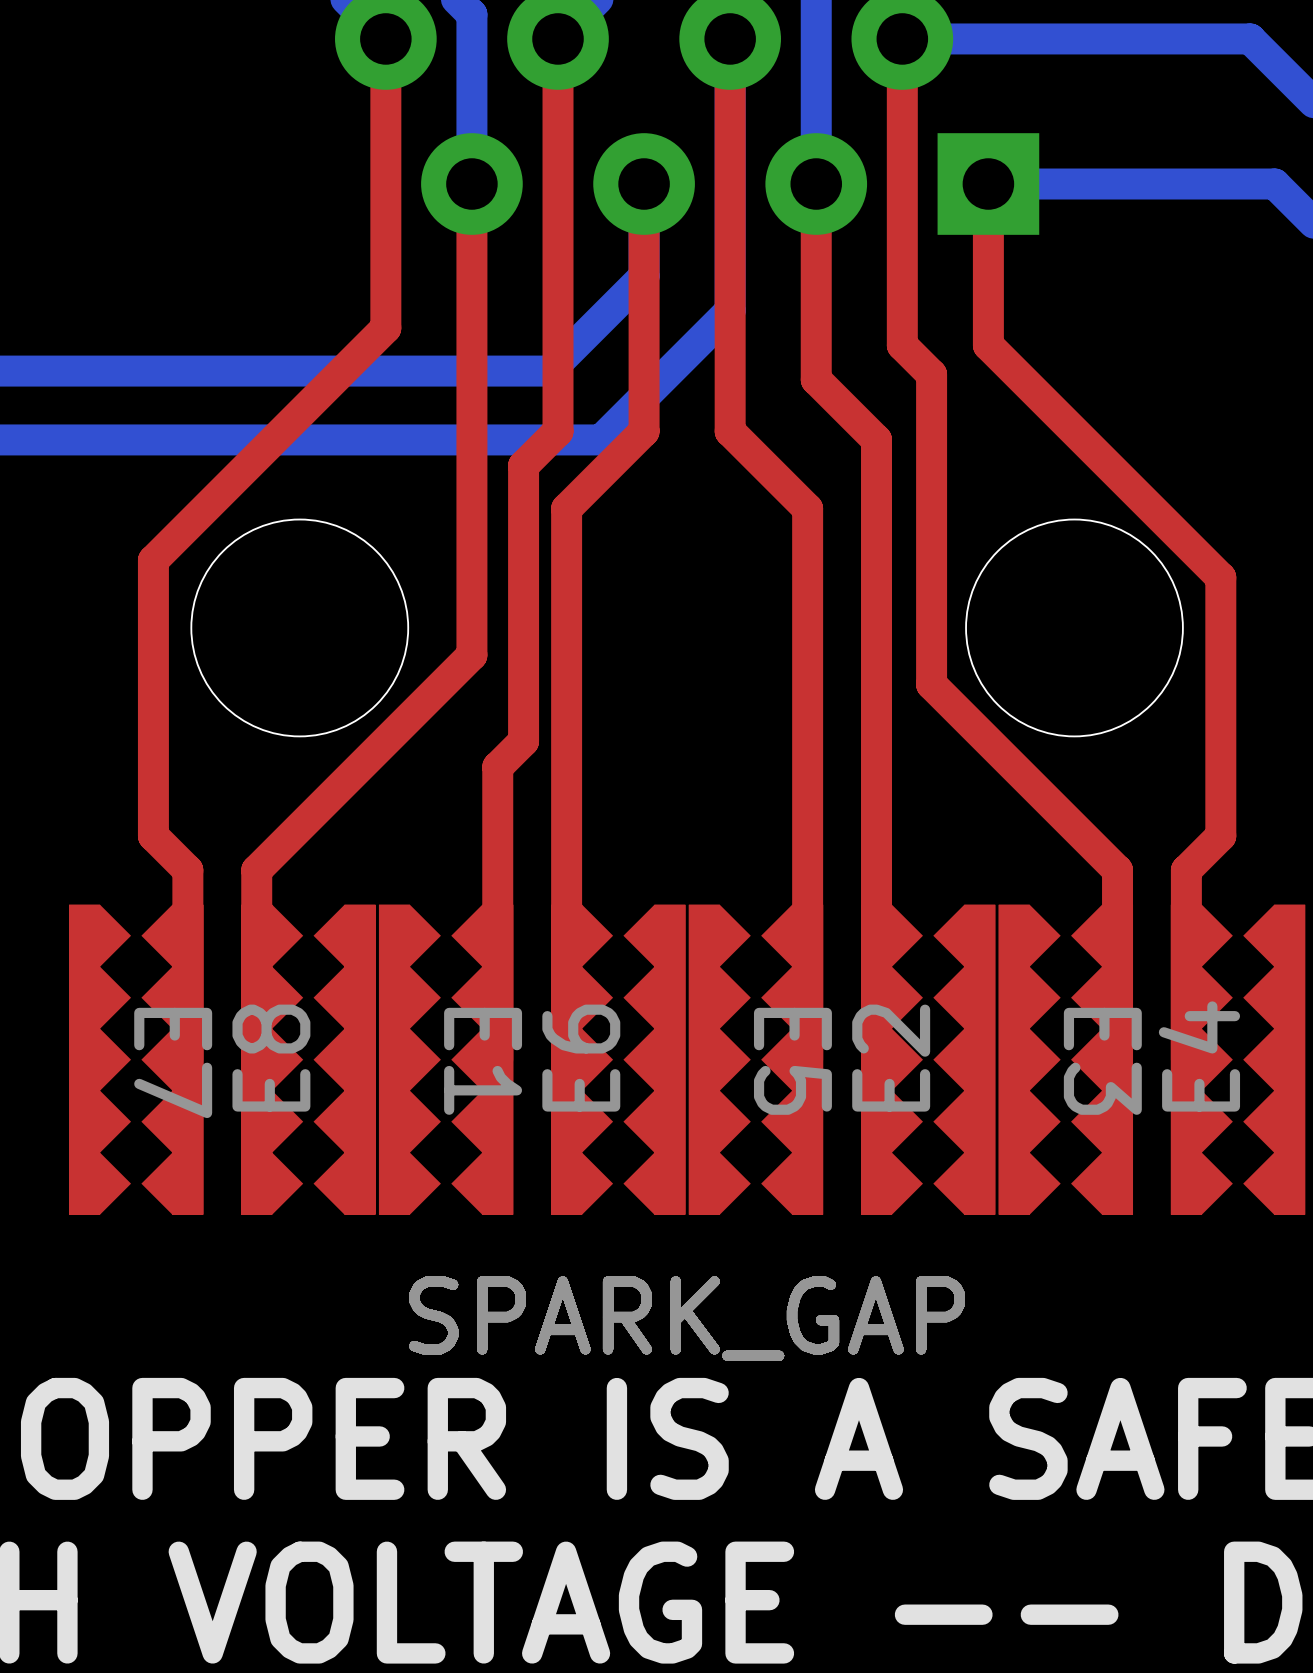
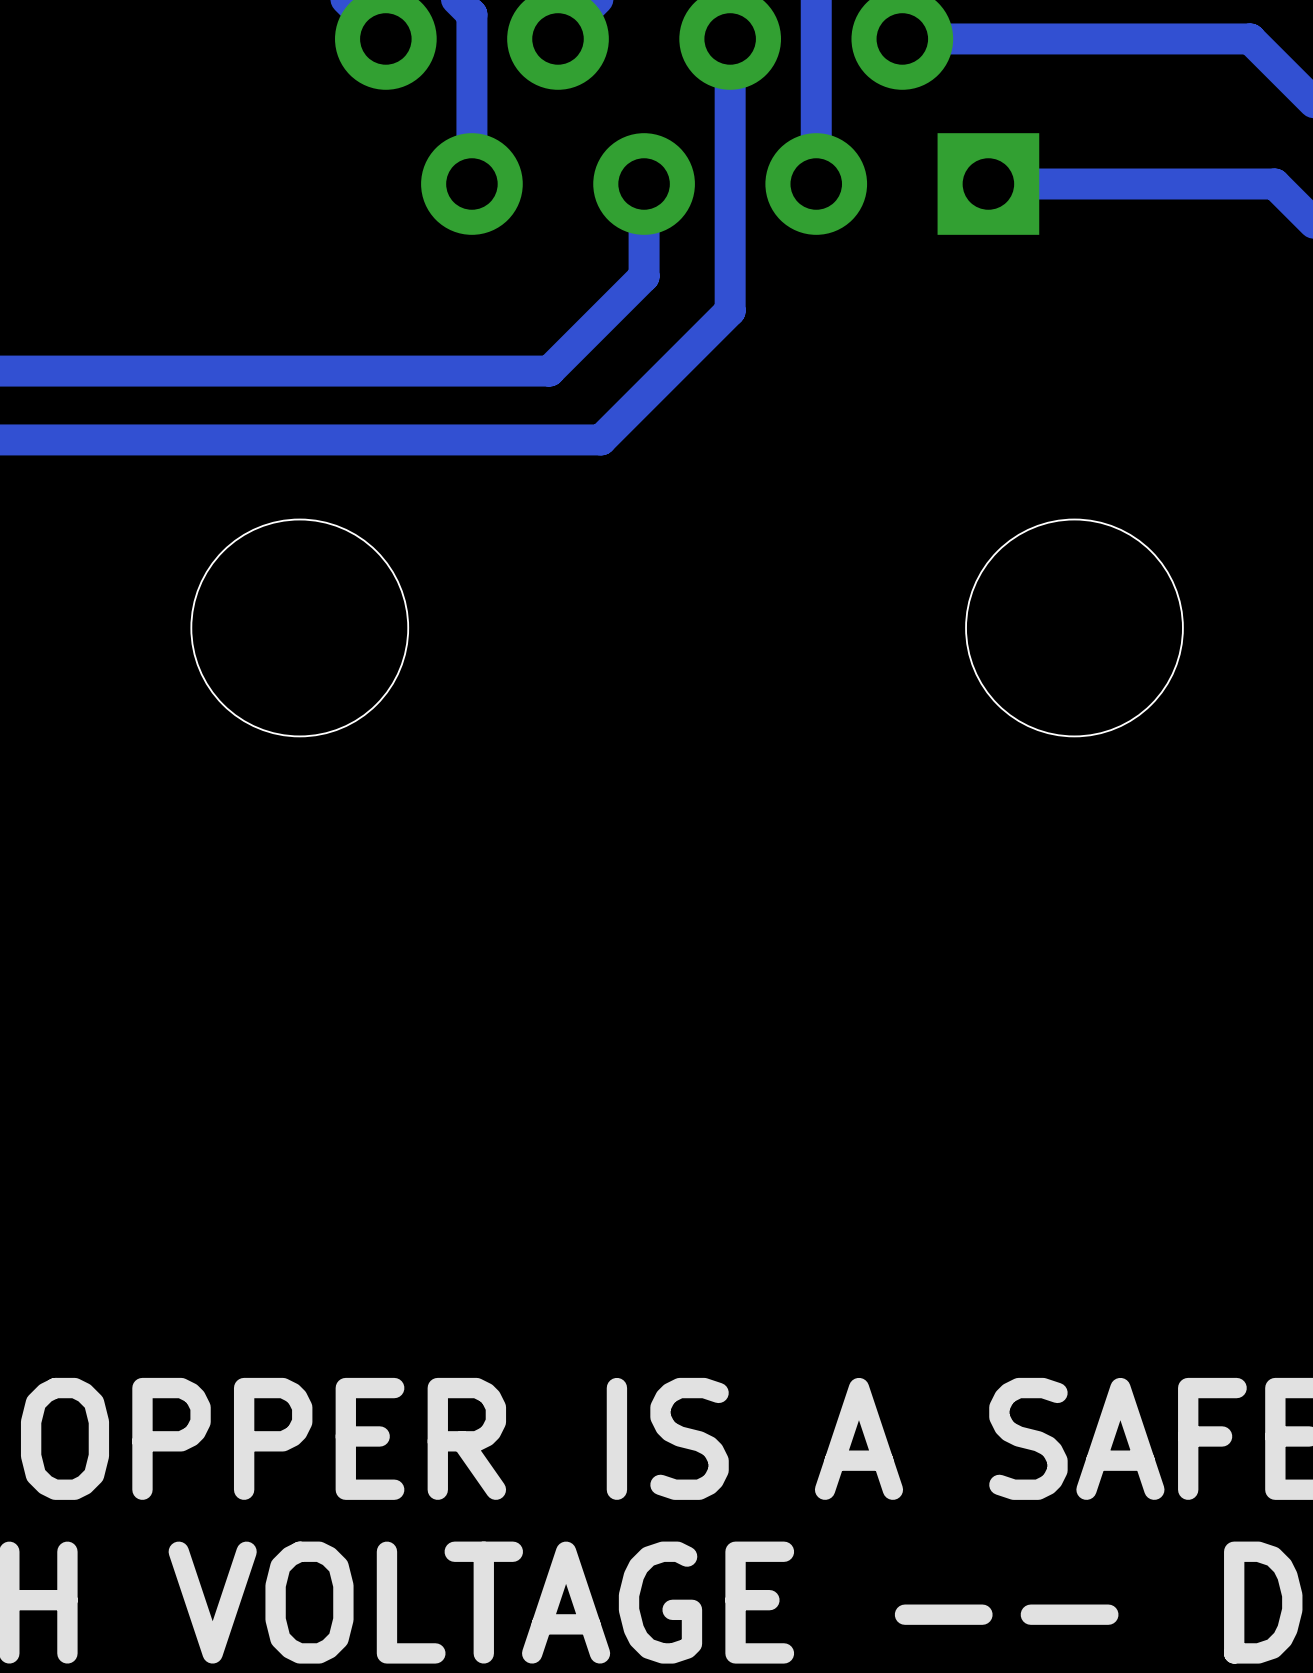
top track: (385, 38) (385, 328) (153, 560) (153, 835) (187, 870) (187, 1059) -> none
top track: (558, 38) (558, 431) (523, 465) (523, 741) (497, 767) (497, 1059) -> none
top track: (730, 38) (730, 431) (807, 508) (807, 1059) -> none
top track: (902, 38) (902, 345) (931, 374) (931, 684) (1117, 870) (1117, 1059) -> none
top track: (471, 184) (471, 655) (256, 870) (256, 1059) -> none
top track: (644, 184) (644, 431) (566, 508) (566, 1059) -> none
top track: (816, 184) (816, 379) (876, 439) (876, 1059) -> none
top track: (988, 184) (988, 345) (1220, 577) (1220, 835) (1186, 870) (1186, 1059) -> none
E8: SPARK_GAP (136, 1059) -> none
E7: SPARK_GAP (308, 1059) -> none
E6: SPARK_GAP (446, 1059) -> none
E1: SPARK_GAP (618, 1059) -> none
E2: SPARK_GAP (755, 1059) -> none
E5: SPARK_GAP (928, 1059) -> none
E4: SPARK_GAP (1065, 1059) -> none
E3: SPARK_GAP (1238, 1059) -> none

